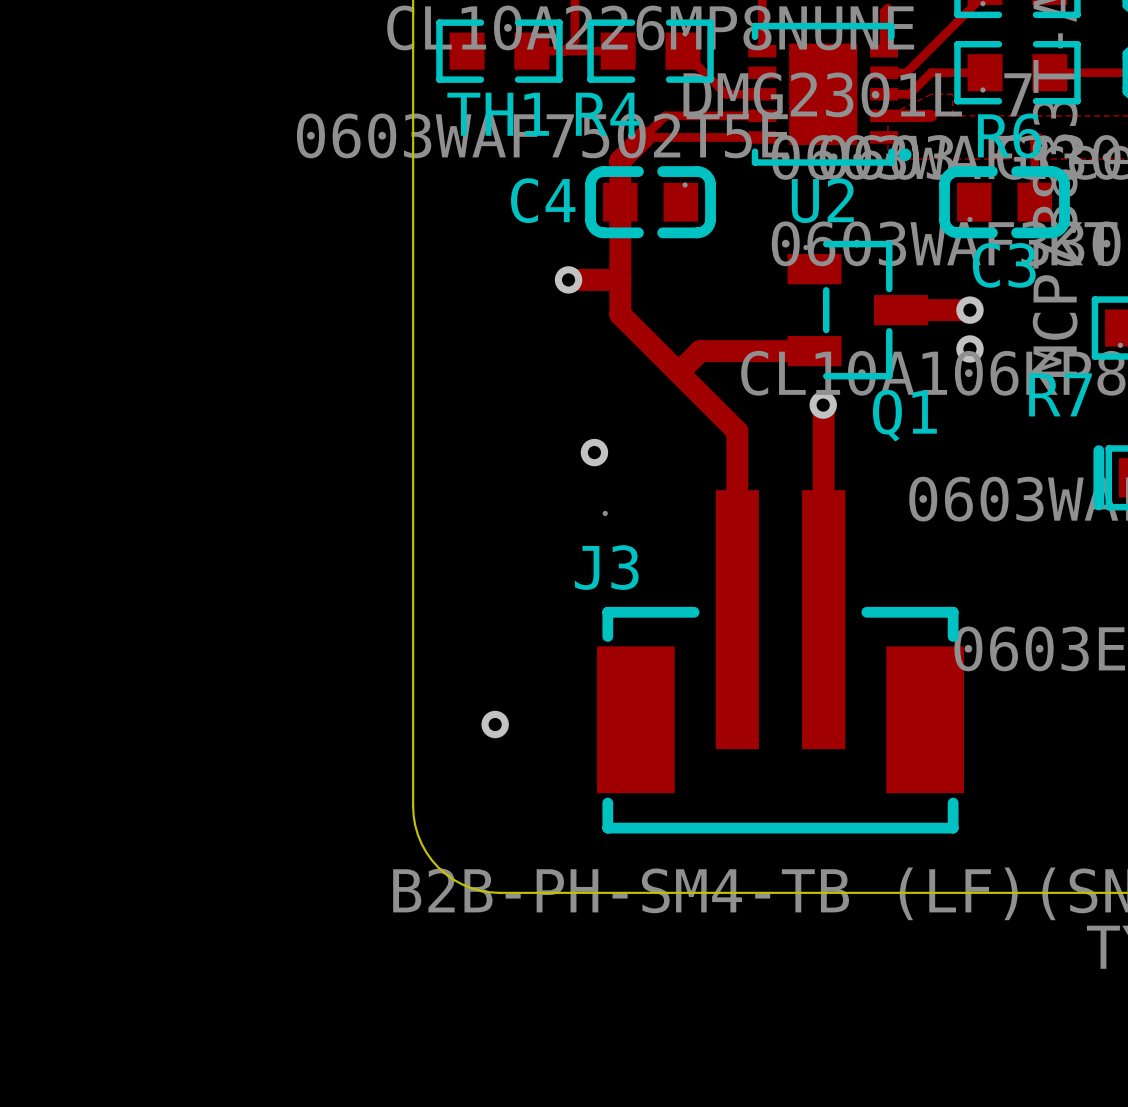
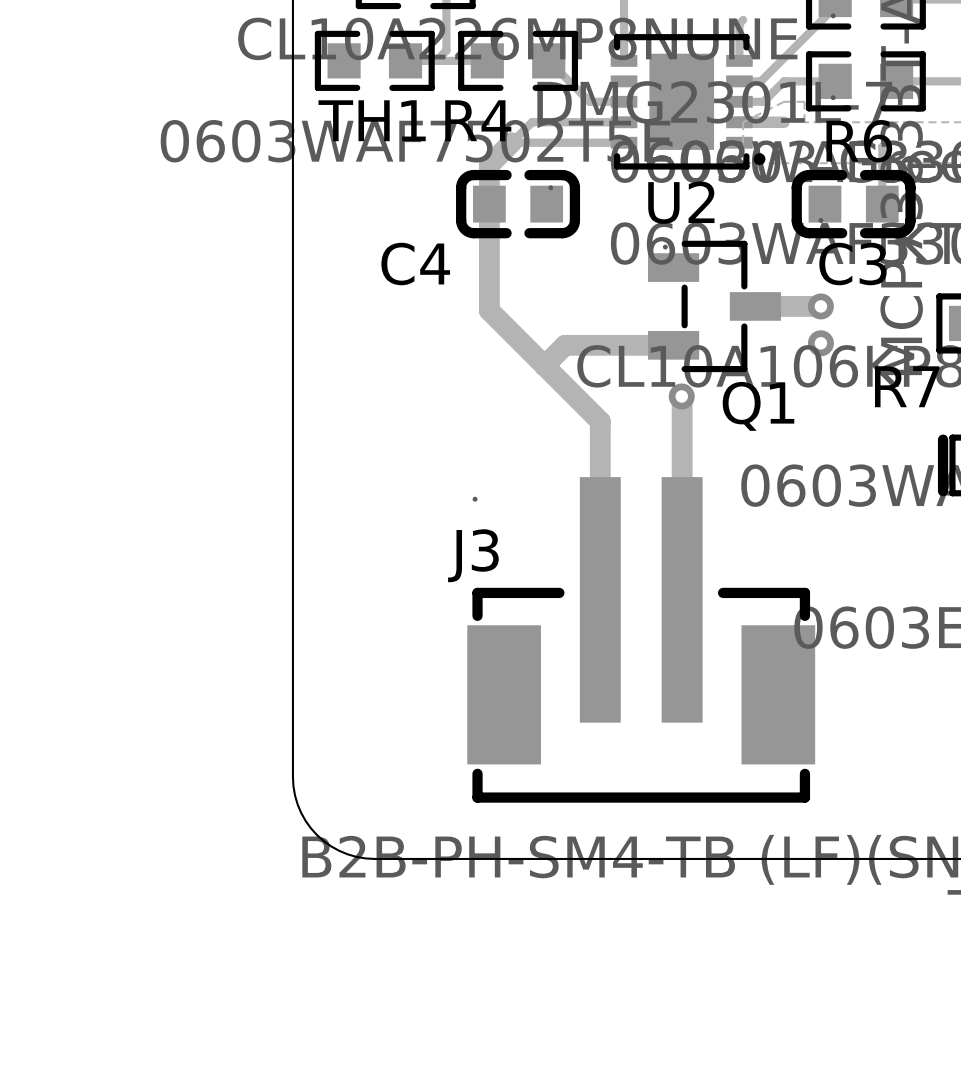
C4 name position: C4 (543, 200) -> C4 (415, 264)
track: (568, 279) (620, 279) -> none
via: (568, 279) -> none
via: (594, 452) -> none
via: (495, 724) -> none

